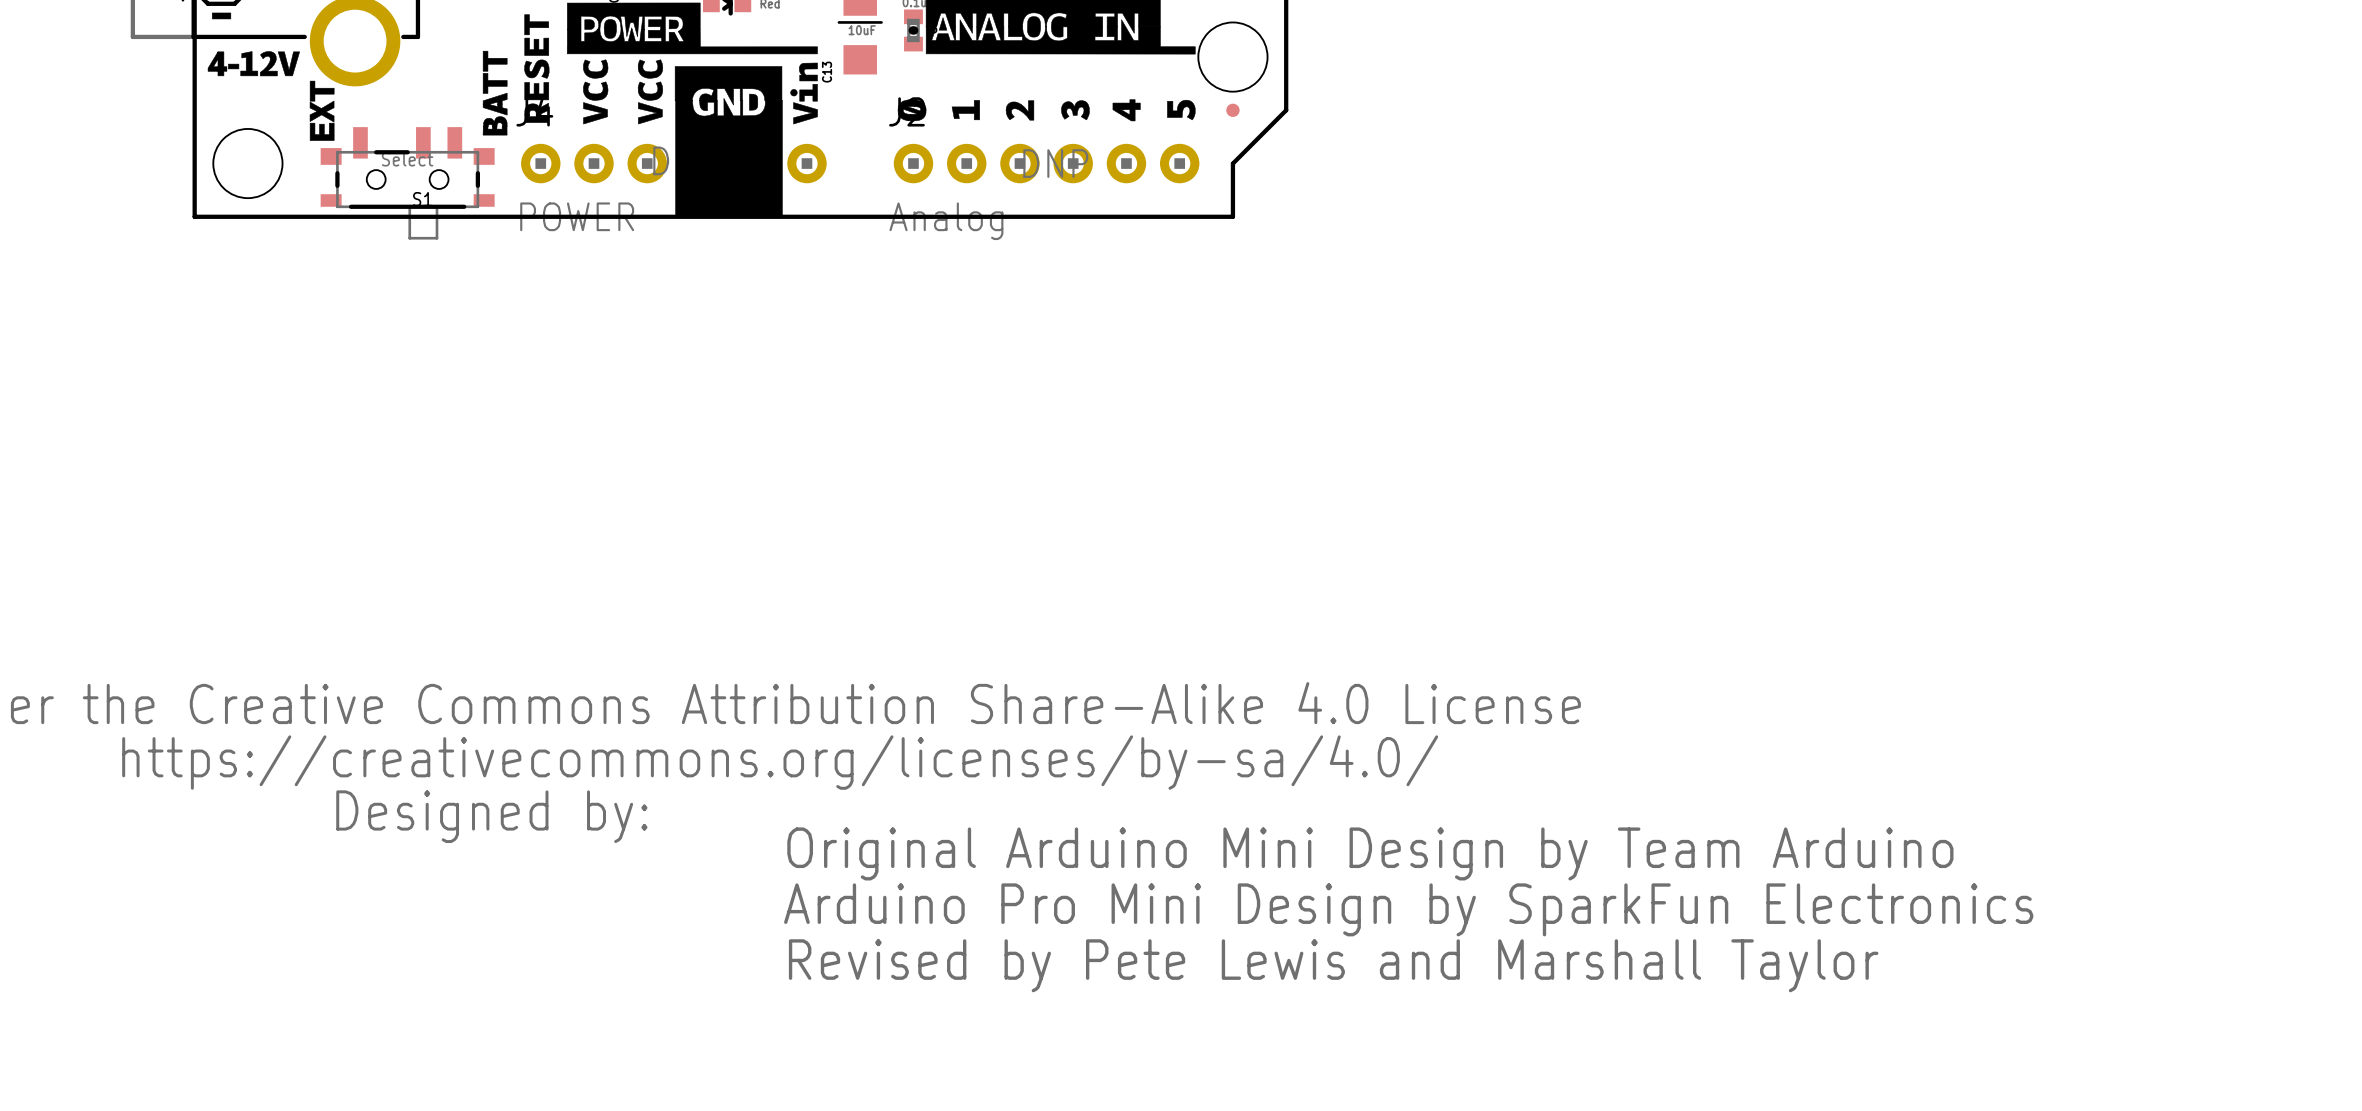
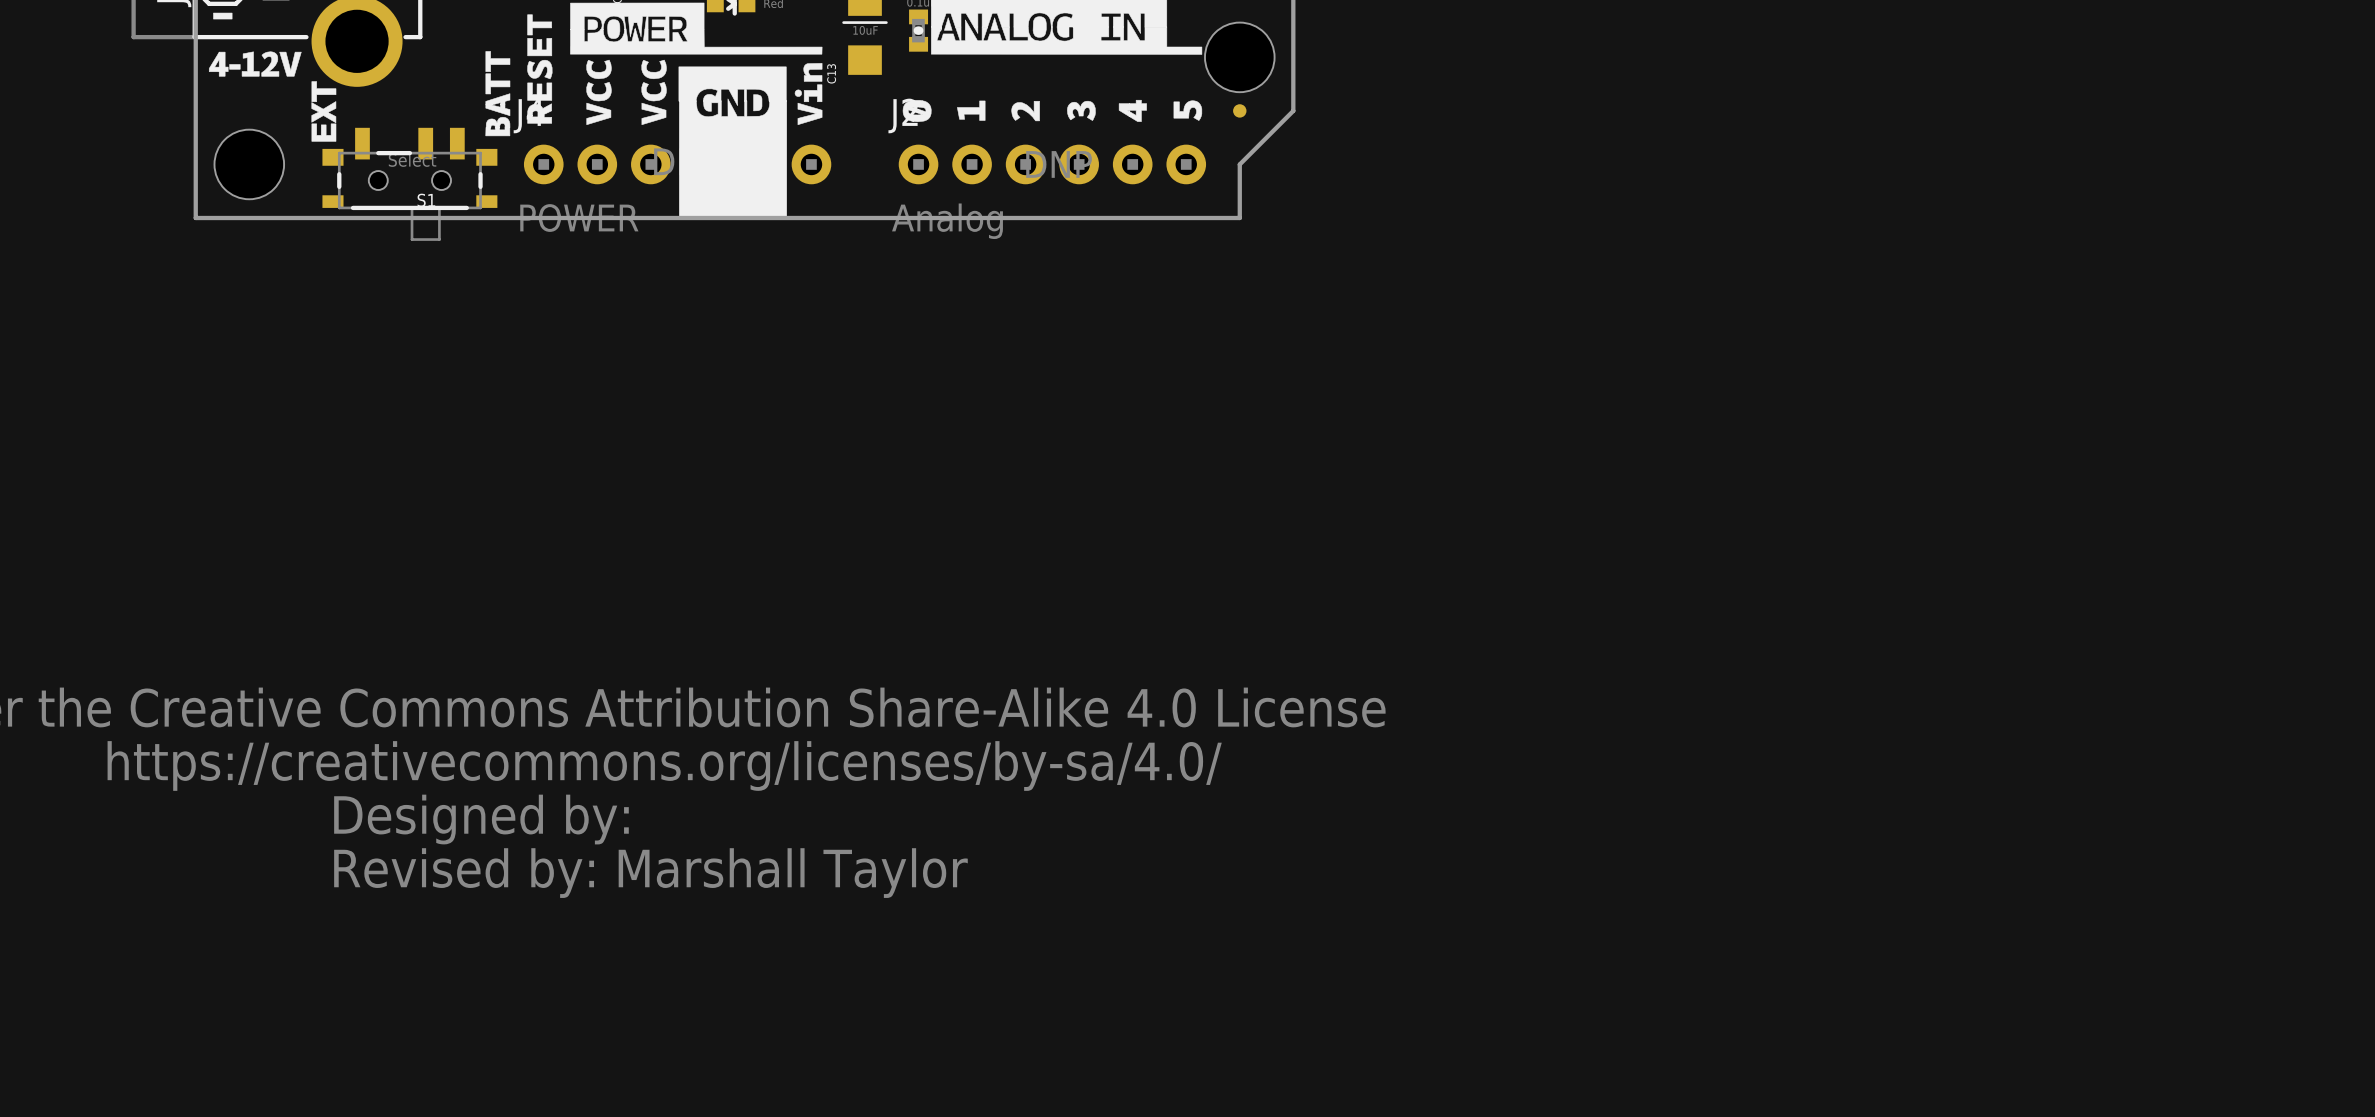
text: Original Arduino Mini Design by Team Arduino (1370, 853) -> none
text: none -> Revised by: Marshall Taylor (650, 873)
text: Arduino Pro Mini Design by SparkFun Electronics (1408, 909) -> none
text: Revised by Pete Lewis and Marshall Taylor (1333, 965) -> none

